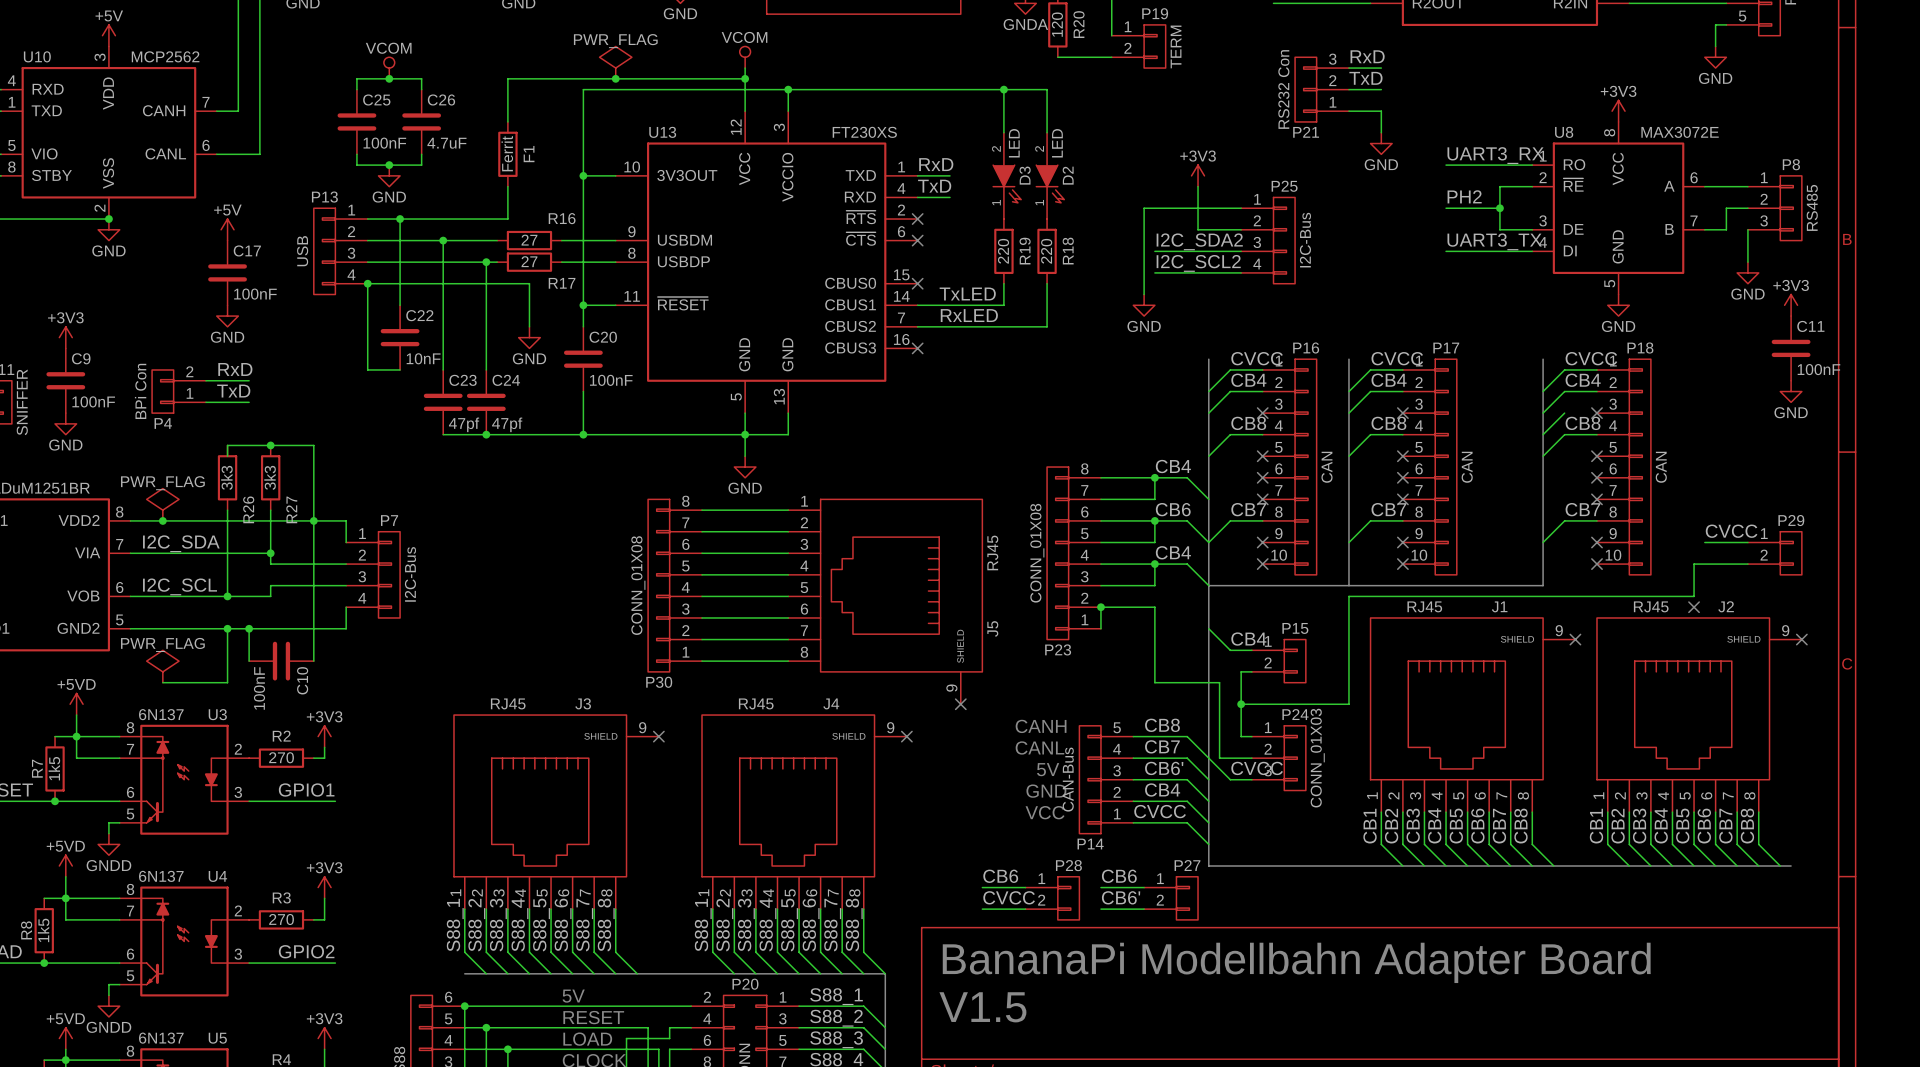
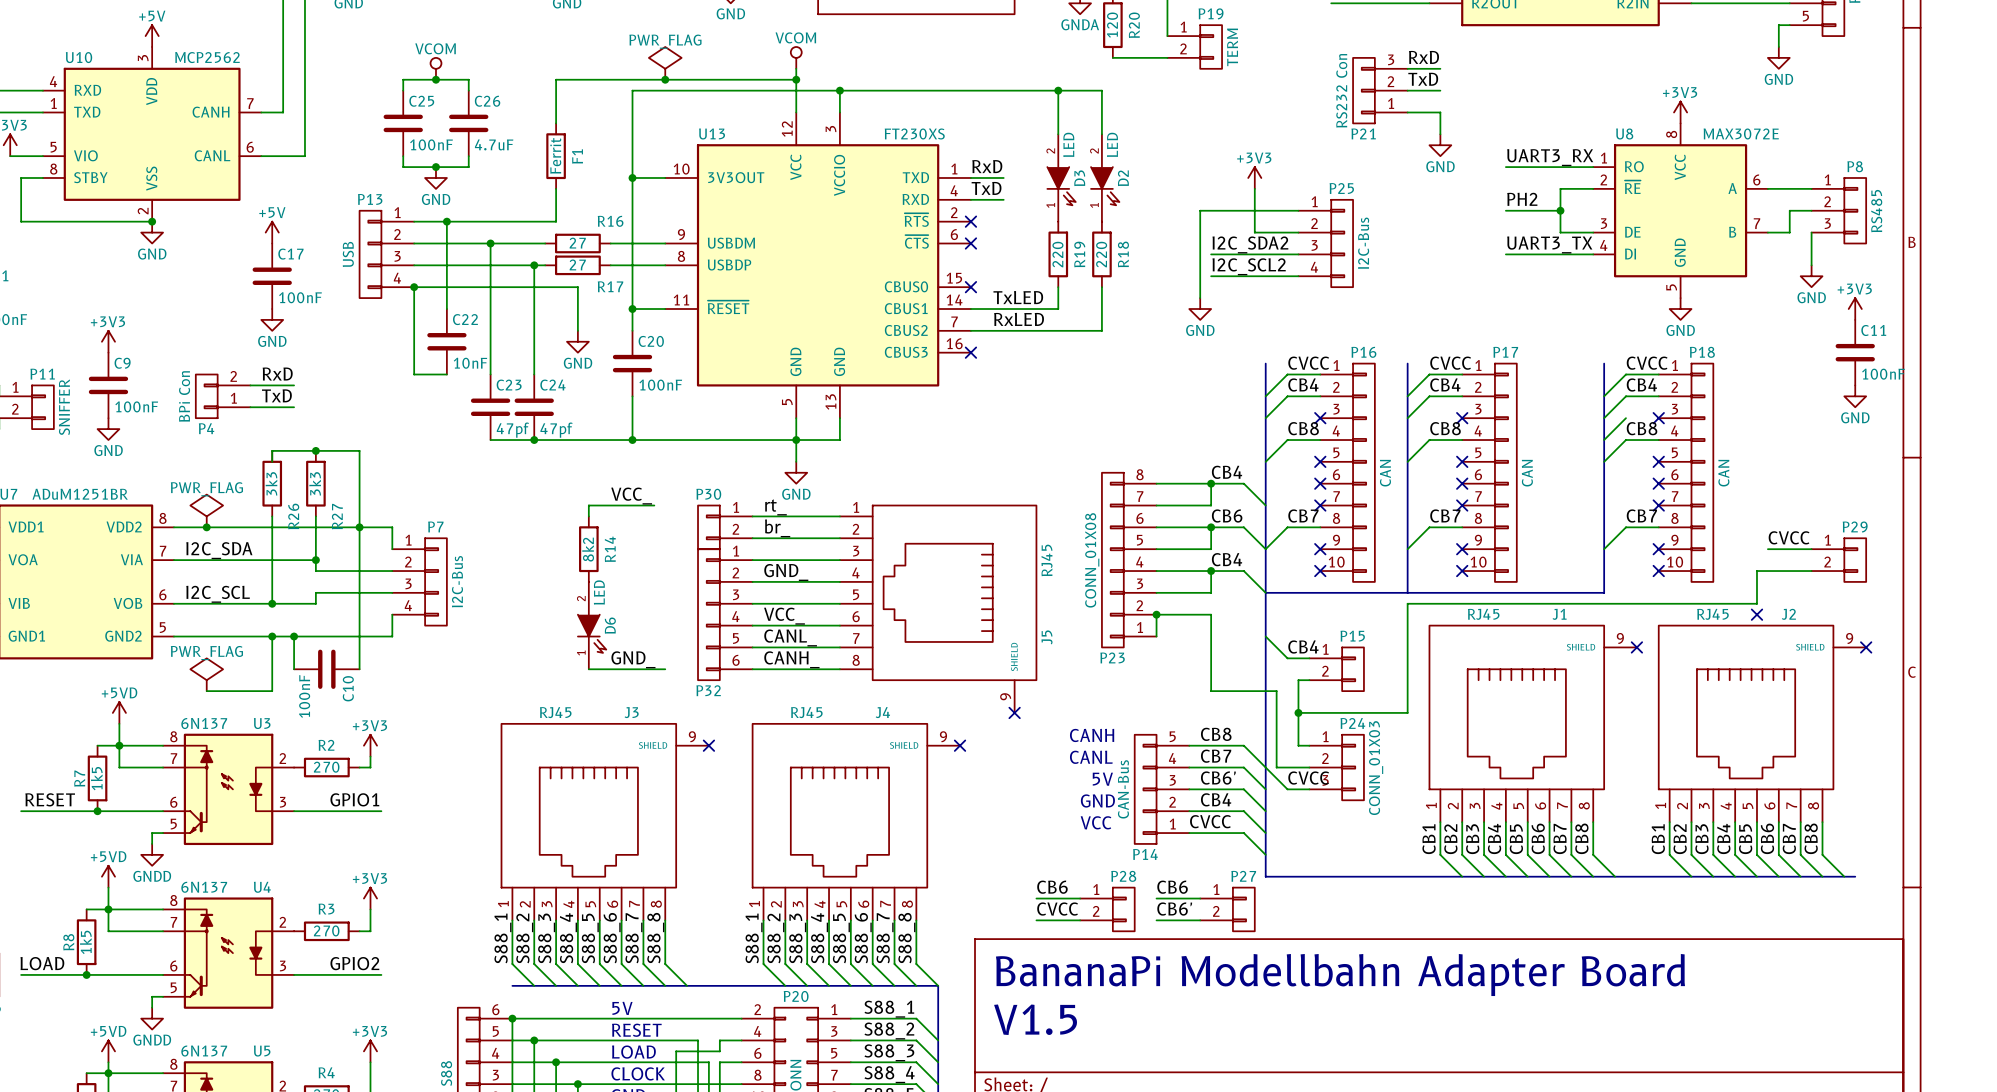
label: none -> VCC_ (631, 496)
wire: none -> (654, 505) (588, 505) (588, 516)
P30 symbol: [648, 499, 703, 672] -> [698, 505, 753, 550]
label: none -> rt_ (776, 507)
label: none -> br_ (777, 528)
R14: none -> 8k2 (588, 549)
label: none -> GND_ (786, 572)
P30 value: CONN_01X08 (638, 585) -> none
P32: none -> (725, 614)
label: none -> VCC_ (784, 616)
D6: none -> LED (592, 625)
label: none -> CANL_ (790, 637)
label: none -> GND_ (633, 659)
label: none -> CANH_ (791, 659)
wire: none -> (588, 669) (665, 669)
P30 name position: P30 (659, 682) -> P30 (708, 494)

